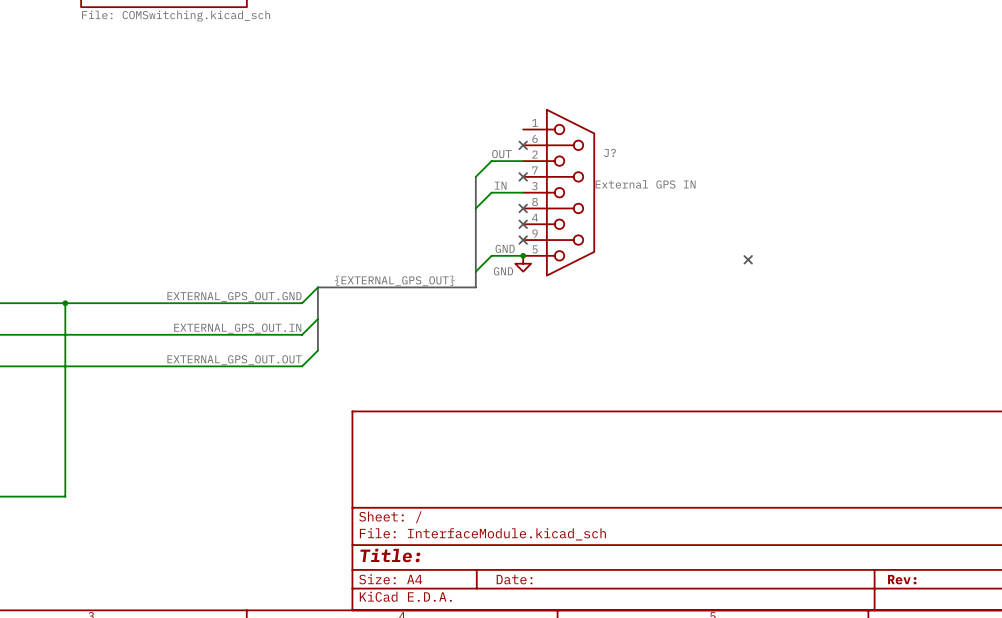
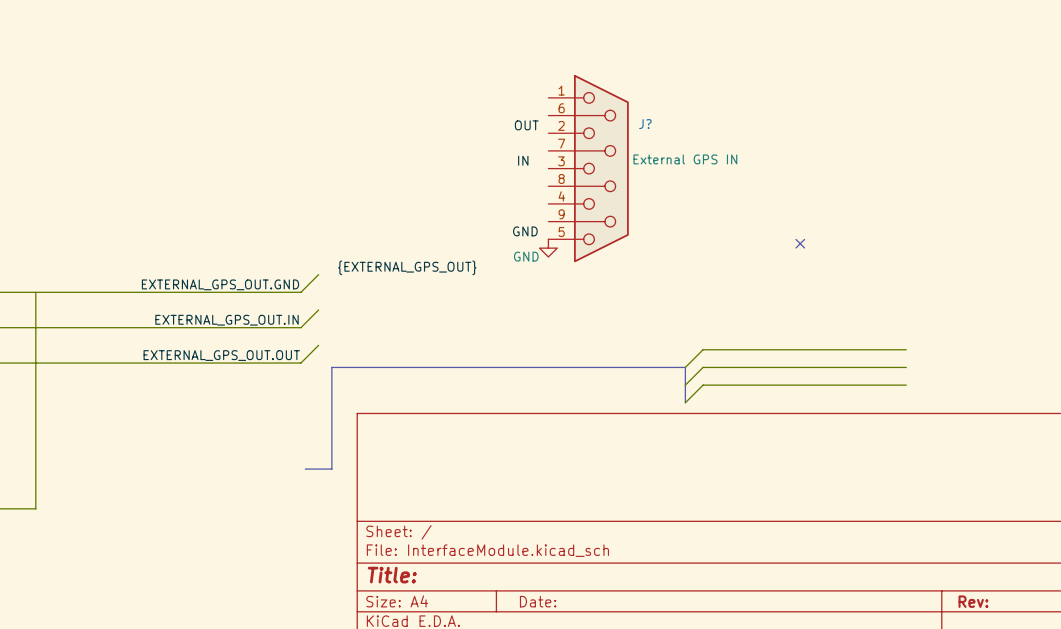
no-connect mark: (523, 145) -> none
wire: (523, 161) (491, 161) (475, 176) -> none
bus: (475, 176) (475, 287) (317, 287) (317, 350) -> none
no-connect mark: (523, 176) -> none
wire: (523, 192) (491, 192) (475, 208) -> none
no-connect mark: (523, 208) -> none
no-connect mark: (523, 224) -> none
no-connect mark: (523, 240) -> none
wire: (523, 255) (491, 255) (475, 271) -> none
junction: (523, 255) -> none
junction: (65, 303) -> none
wire: none -> (906, 349) (703, 349) (685, 367)
wire: none -> (906, 367) (703, 367) (685, 385)
wire: none -> (906, 385) (703, 385) (685, 402)
bus: none -> (685, 402) (685, 367) (331, 367) (331, 469) (305, 469)

